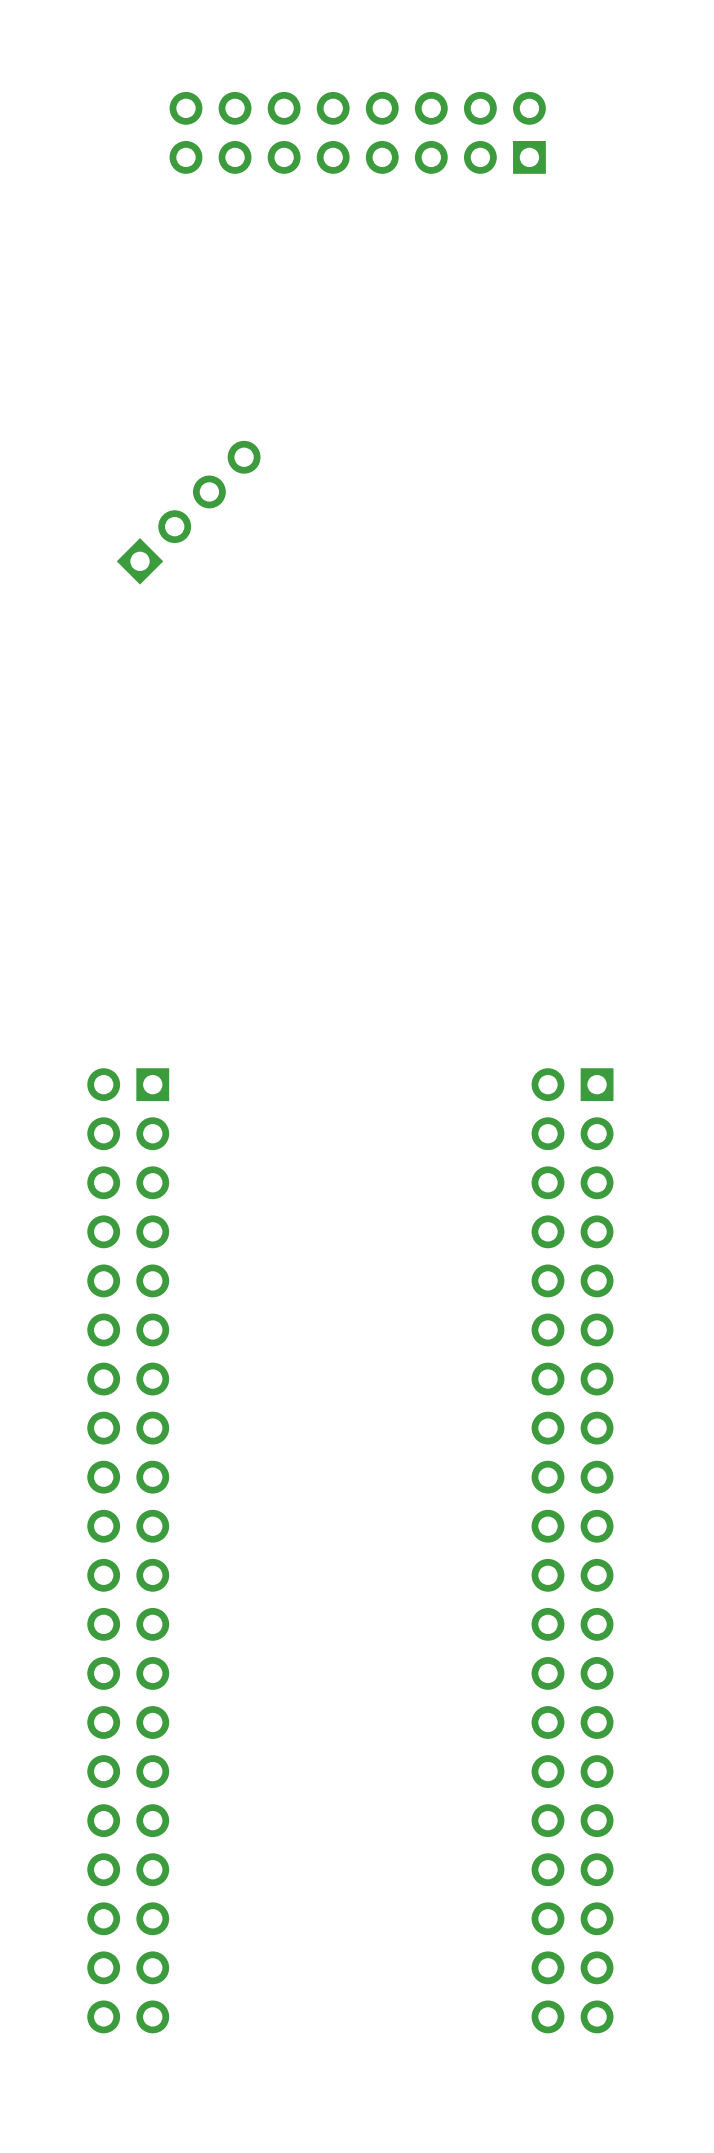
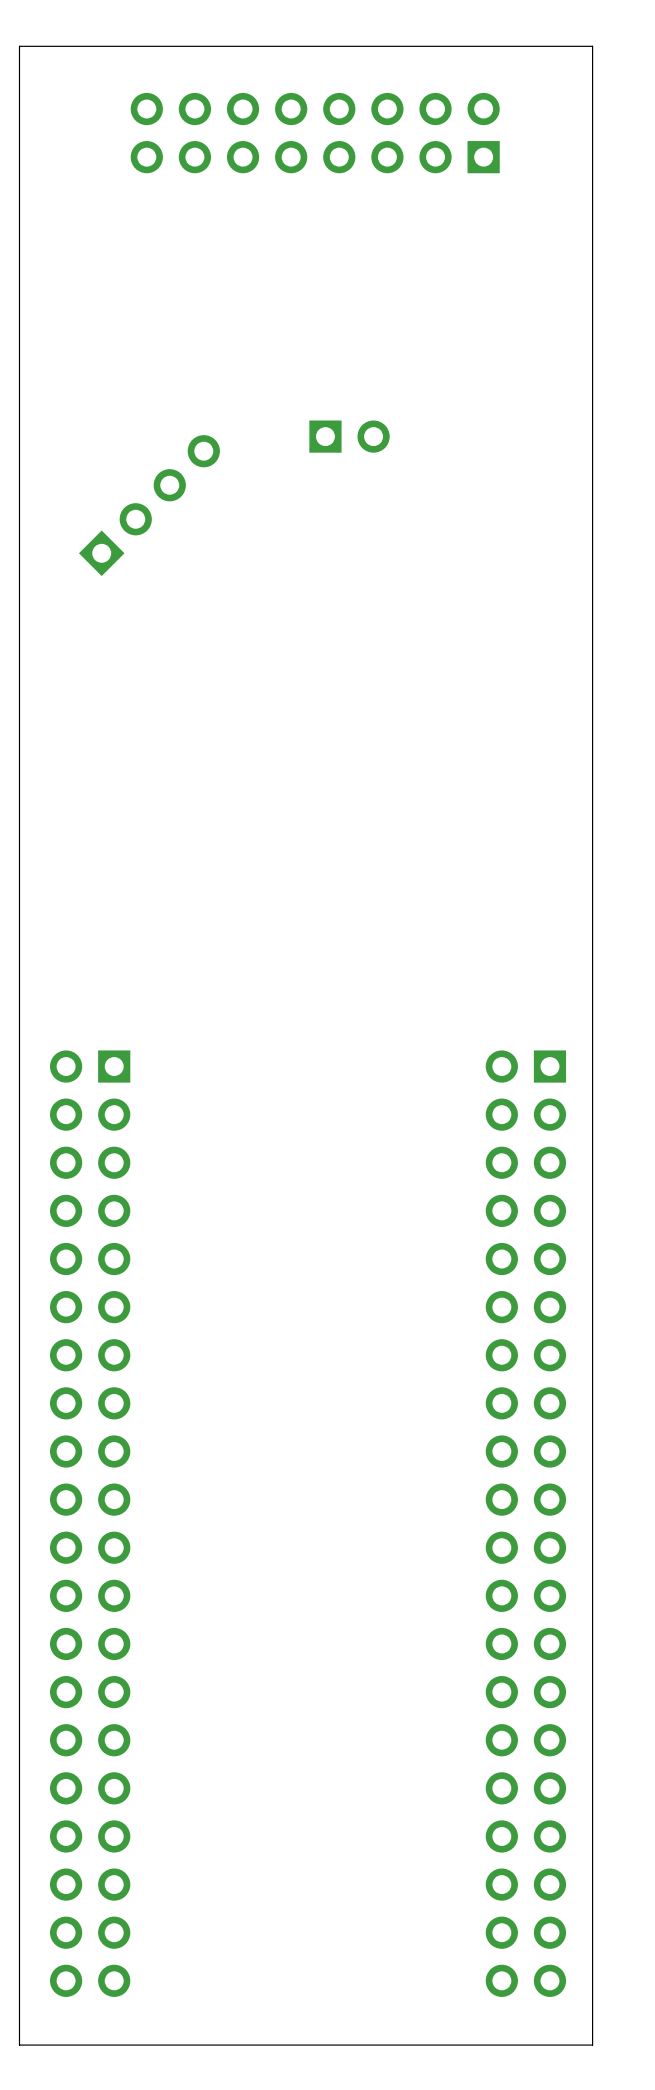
board edge: none -> (592, 46) (19, 46) (19, 2045) (592, 2045) (592, 46)
part: none -> (349, 436)

